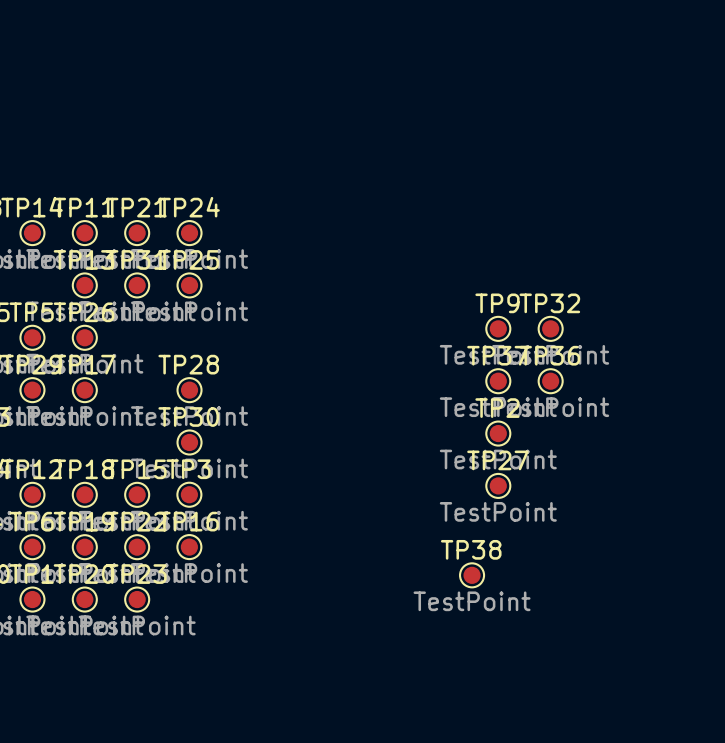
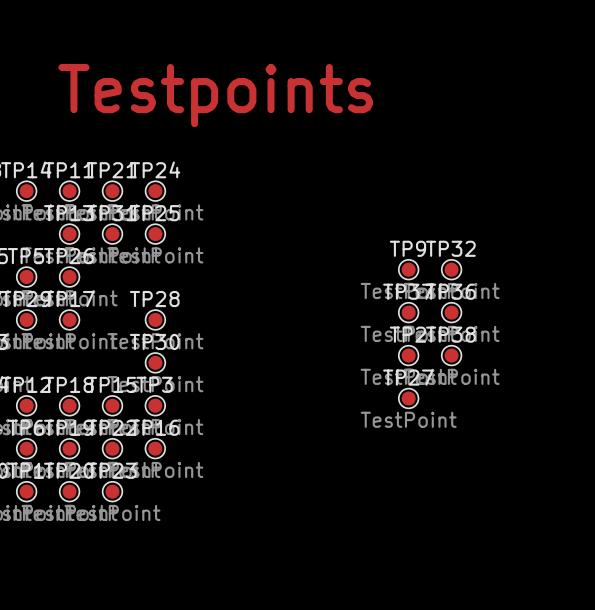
text: none -> Testpoints (215, 95)
TP38 position: (472, 575) -> (451, 355)

